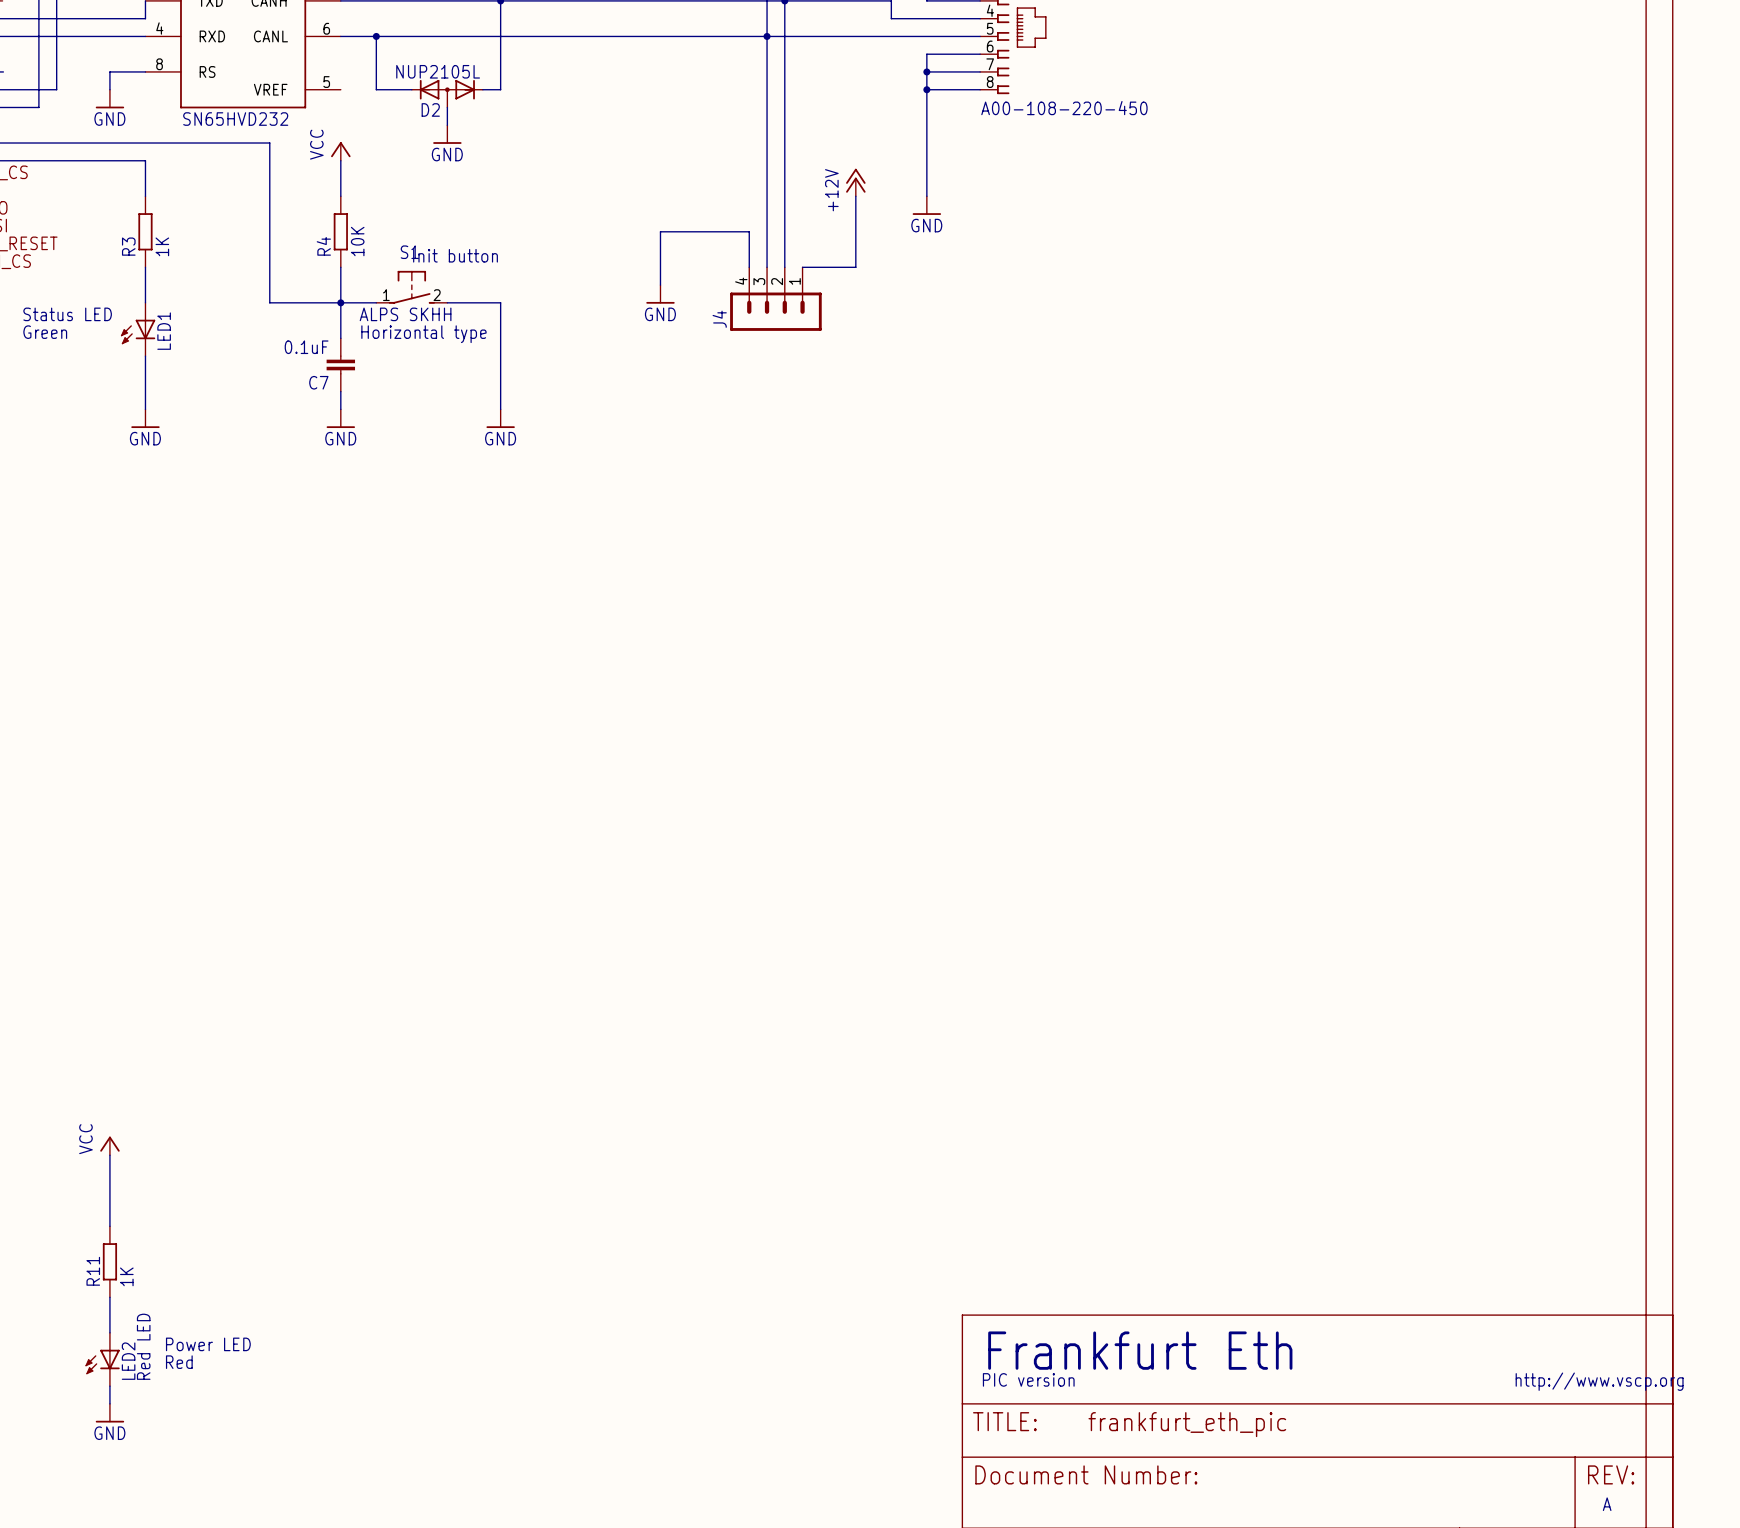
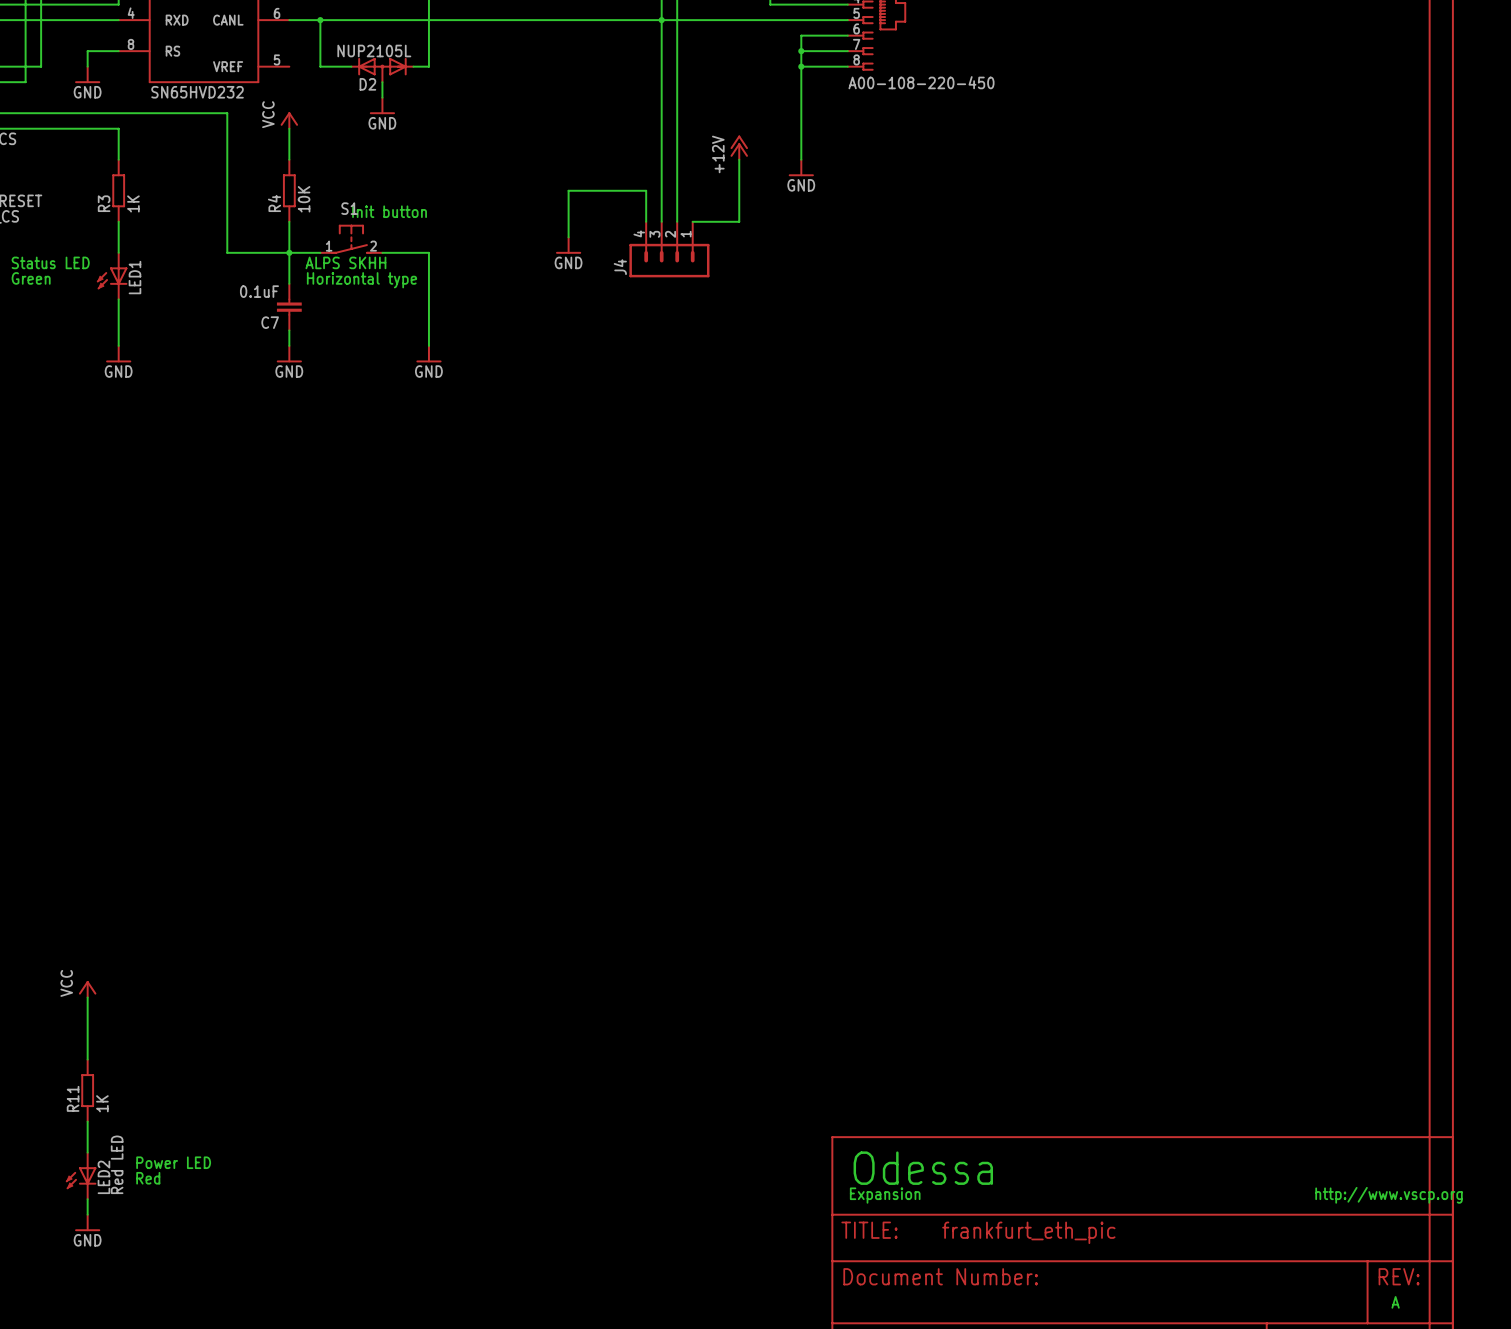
text: Frankfurt Eth (1140, 1350) -> Odessa (923, 1168)
text: PIC version (1028, 1379) -> Expansion (885, 1195)

